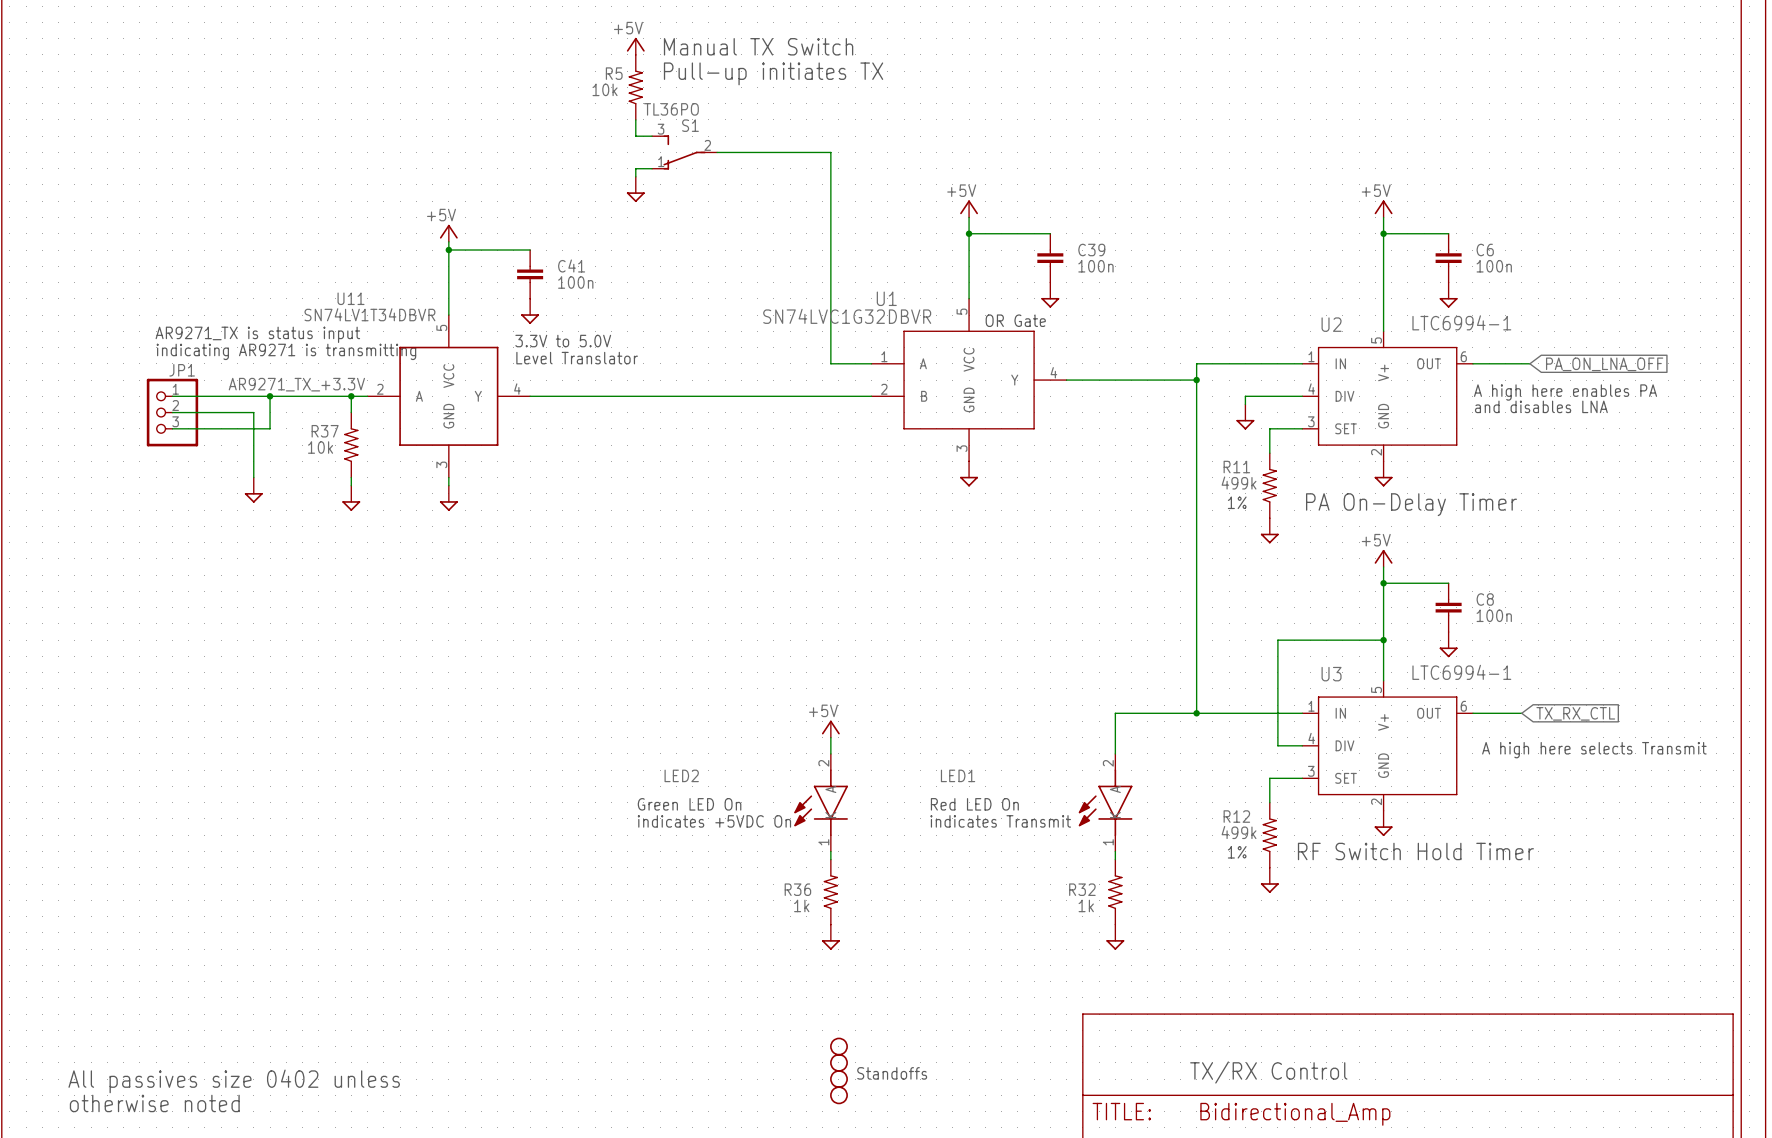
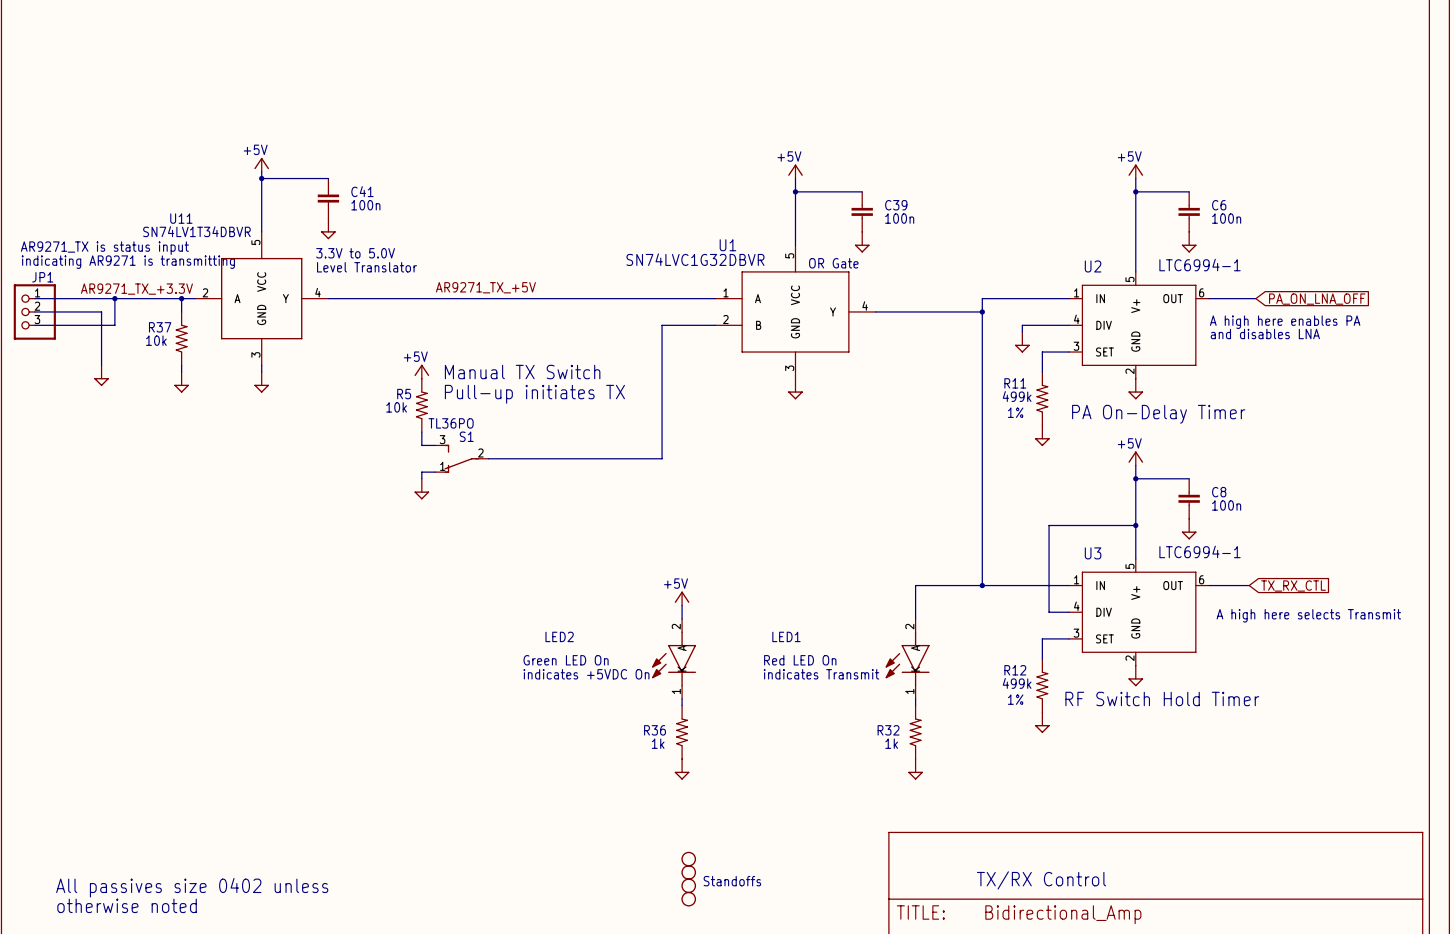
power symbol: +5V (635, 46) -> none
text: Manual TX Switch (758, 46) -> none
text: Pull-up initiates TX (773, 73) -> none
R5 position: (635, 87) -> (421, 405)
wire: (635, 119) (635, 136) (652, 136) -> none
S1 position: (684, 152) -> (461, 458)
wire: (717, 152) (830, 152) (830, 363) -> (328, 298) (682, 298)
wire: (652, 168) (635, 168) (635, 176) -> none
power symbol: (635, 189) -> none
power symbol: none -> +5V (261, 164)
junction: none -> (261, 178)
power symbol: +5V (448, 233) -> none
wire: (448, 241) (448, 315) -> (261, 171) (261, 231)
wire: (448, 250) (530, 250) -> (261, 178) (328, 178)
junction: (448, 250) -> none
C41 position: (530, 274) -> (328, 198)
power symbol: none -> (328, 228)
power symbol: (530, 311) -> none
text position: AR9271_TX is status input (257, 334) -> AR9271_TX is status input (104, 248)
text position: 3.3V to 5.0V (563, 341) -> 3.3V to 5.0V (355, 253)
label: none -> AR9271_TX_+5V (485, 287)
text position: indicating AR9271 is transmitting (286, 351) -> indicating AR9271 is transmitting (128, 262)
text position: Level Translator (577, 358) -> Level Translator (367, 267)
junction: none -> (114, 298)
junction: none -> (181, 298)
label position: AR9271_TX_+3.3V (296, 384) -> AR9271_TX_+3.3V (136, 289)
wire: (172, 396) (367, 396) -> (34, 298) (194, 298)
wire: (270, 396) (270, 428) (172, 428) -> (114, 298) (114, 325) (34, 325)
junction: (270, 396) -> none
wire: (351, 396) (351, 412) -> (181, 298) (181, 311)
junction: (351, 396) -> none
U11 position: (448, 396) -> (261, 298)
wire: (530, 396) (806, 396) -> (488, 458) (662, 458) (662, 325)
wire: (172, 412) (253, 412) (253, 477) -> (34, 311) (101, 311) (101, 365)
JP1 position: (172, 412) -> (34, 311)
R37 position: (351, 445) -> (181, 338)
power symbol: none -> +5V (421, 371)
text: none -> Manual TX Switch (522, 372)
power symbol: none -> (101, 375)
power symbol: none -> (181, 382)
power symbol: none -> (261, 382)
wire: (351, 477) (351, 485) -> (181, 365) (181, 372)
text: none -> Pull-up initiates TX (534, 394)
power symbol: (253, 490) -> none
power symbol: (351, 498) -> none
power symbol: (448, 498) -> none
wire: none -> (421, 432) (421, 445) (435, 445)
wire: none -> (435, 472) (421, 472) (421, 478)
power symbol: none -> (421, 489)

